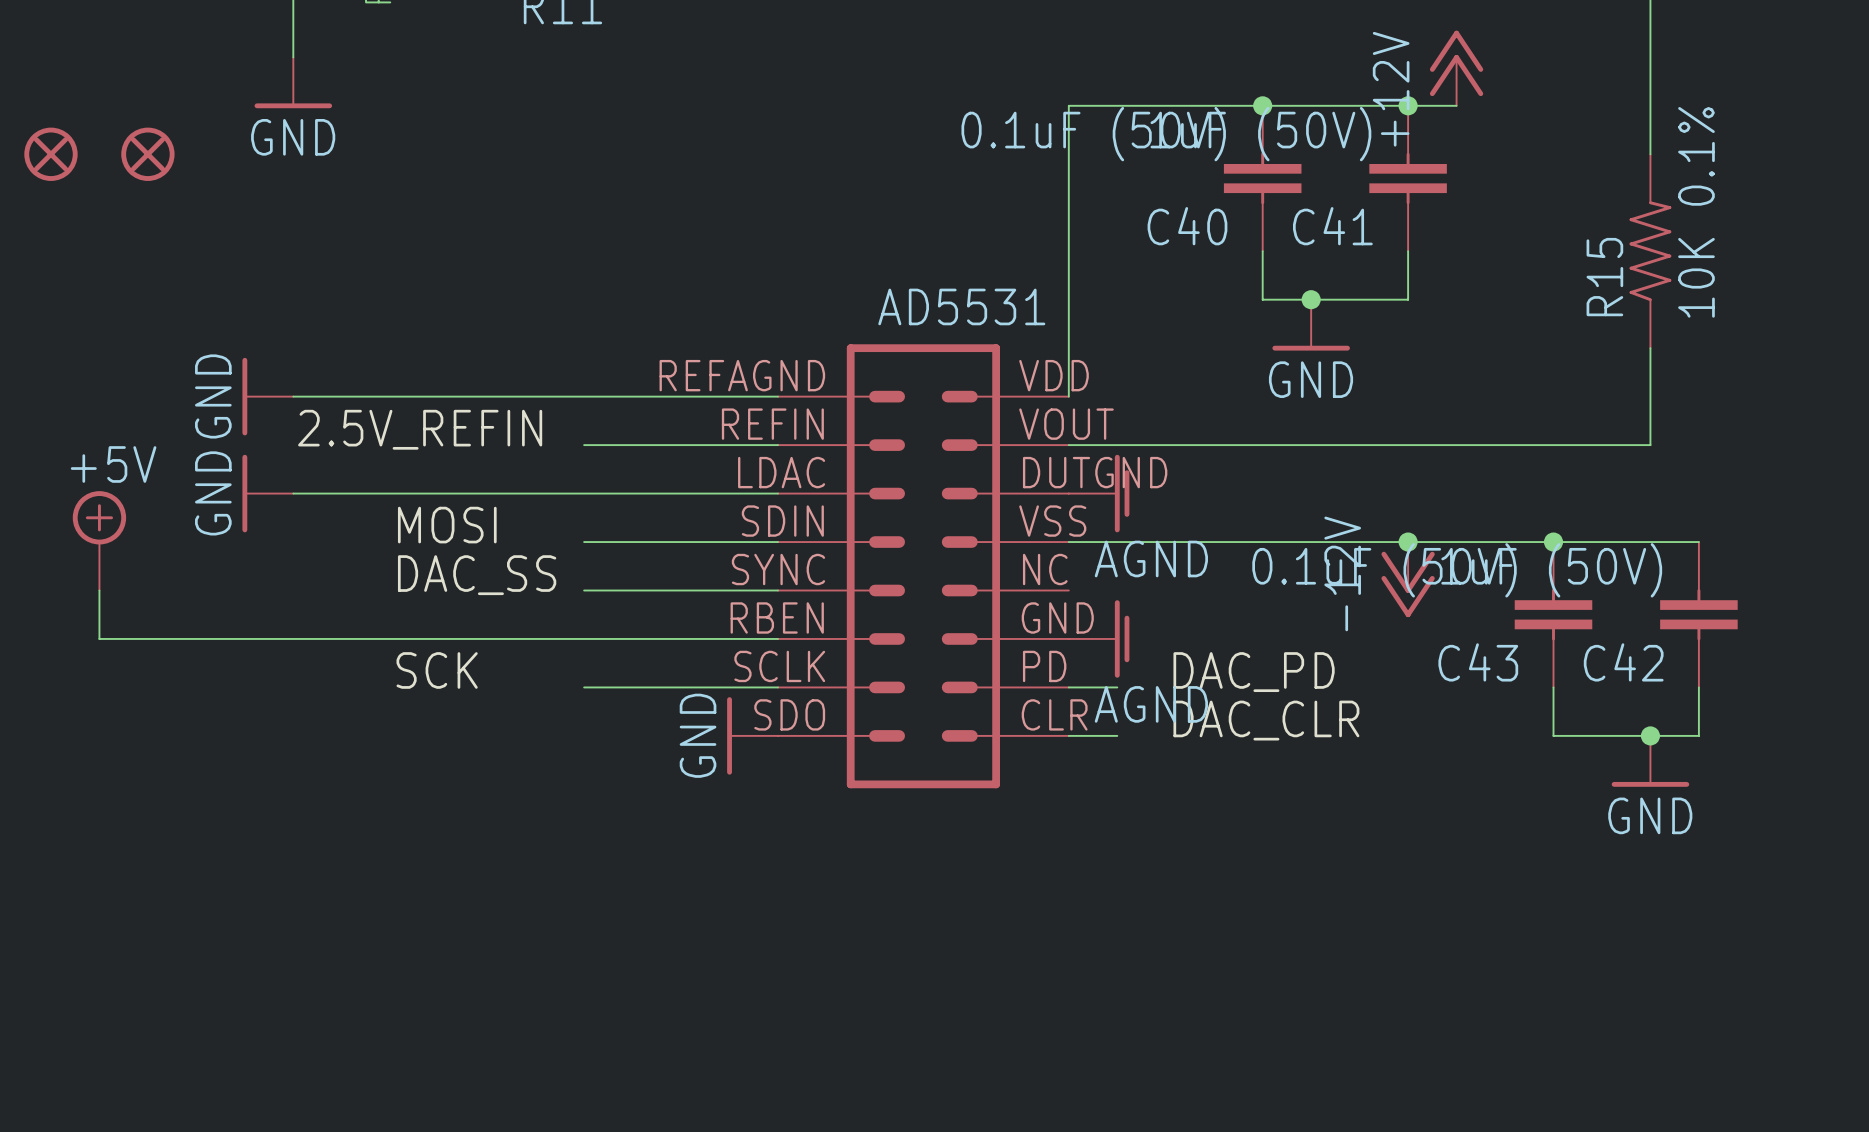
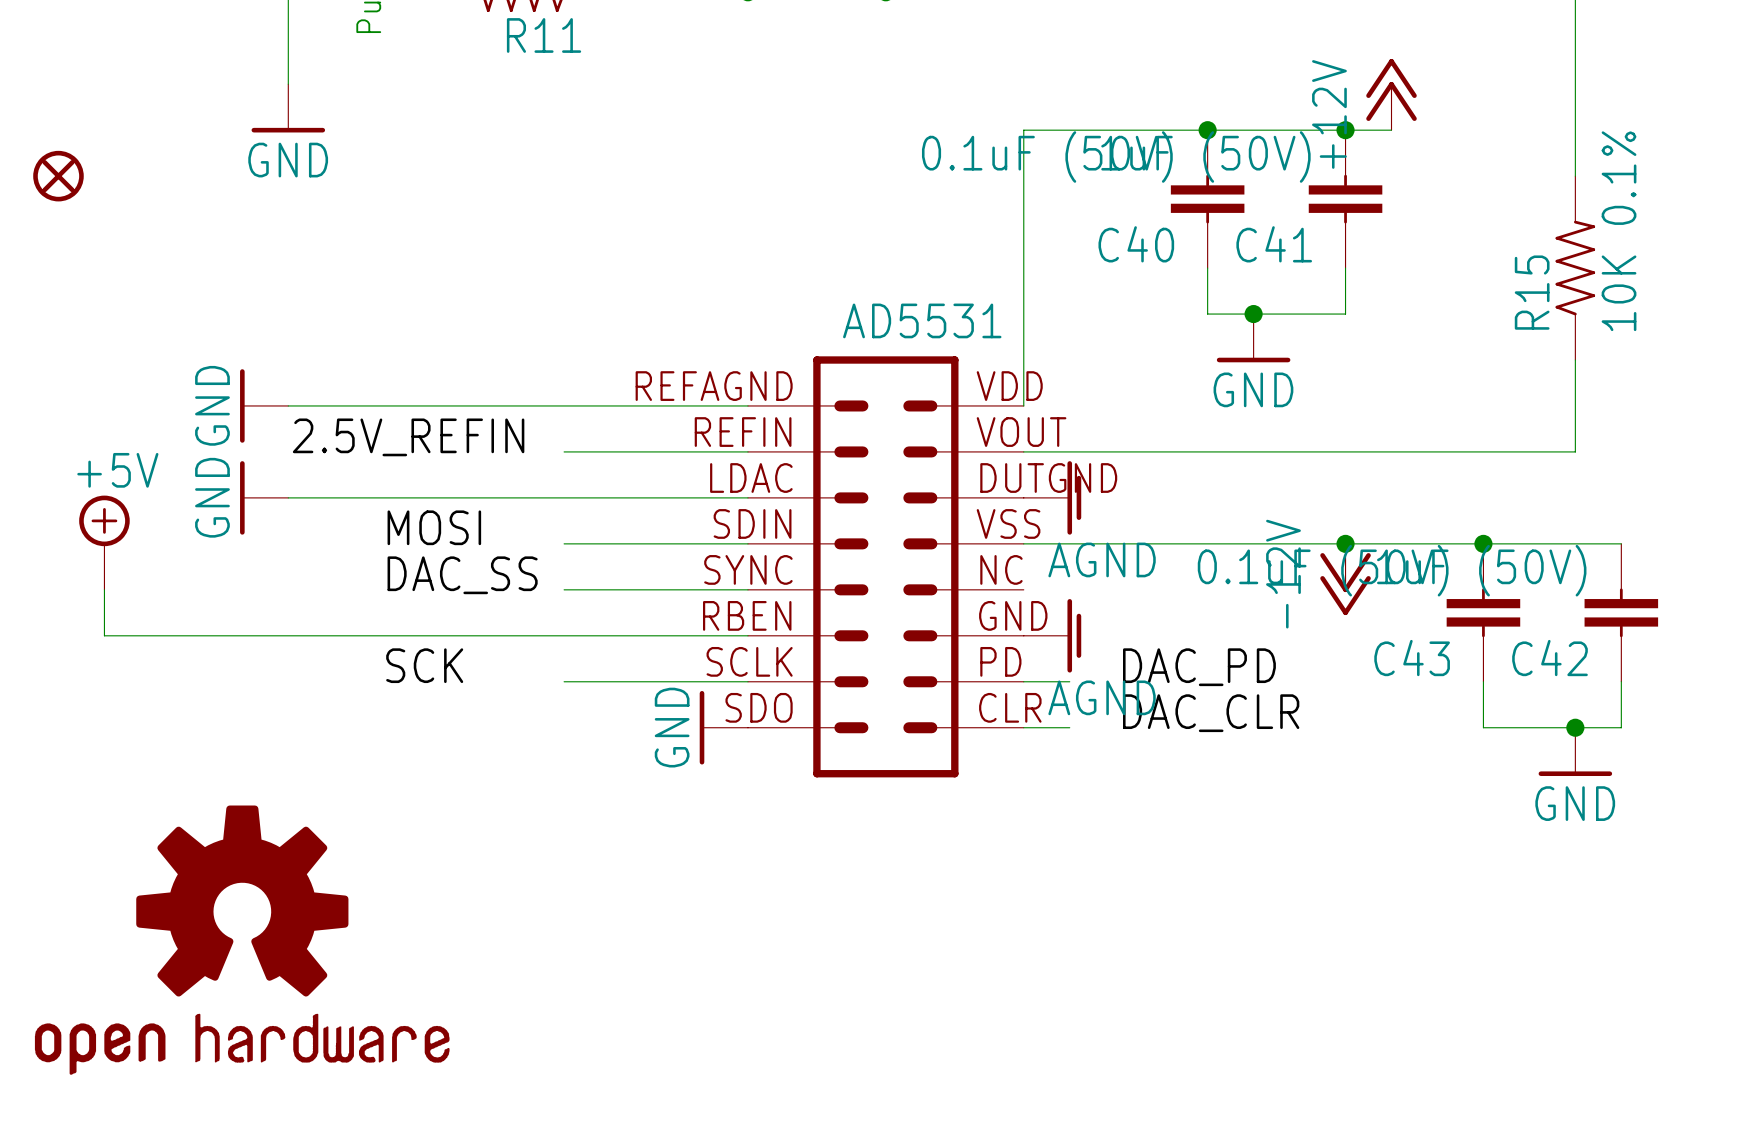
part: (147, 154) -> none
part: none -> (242, 940)

